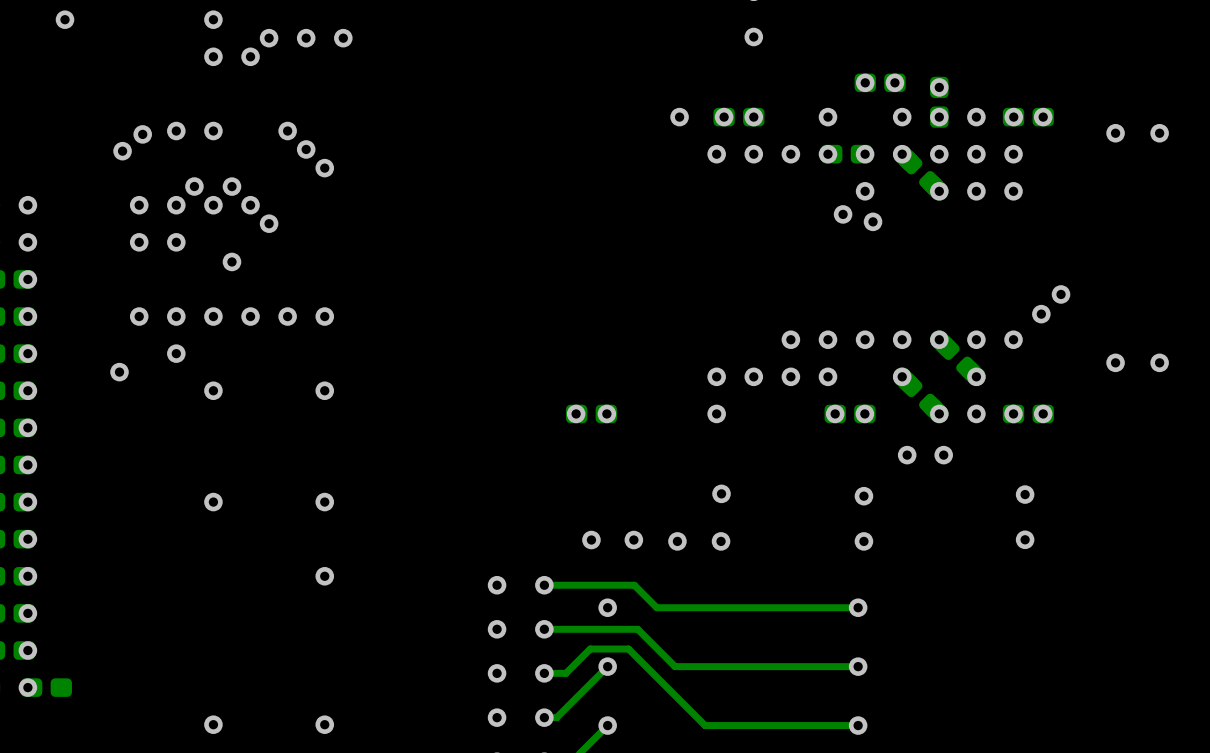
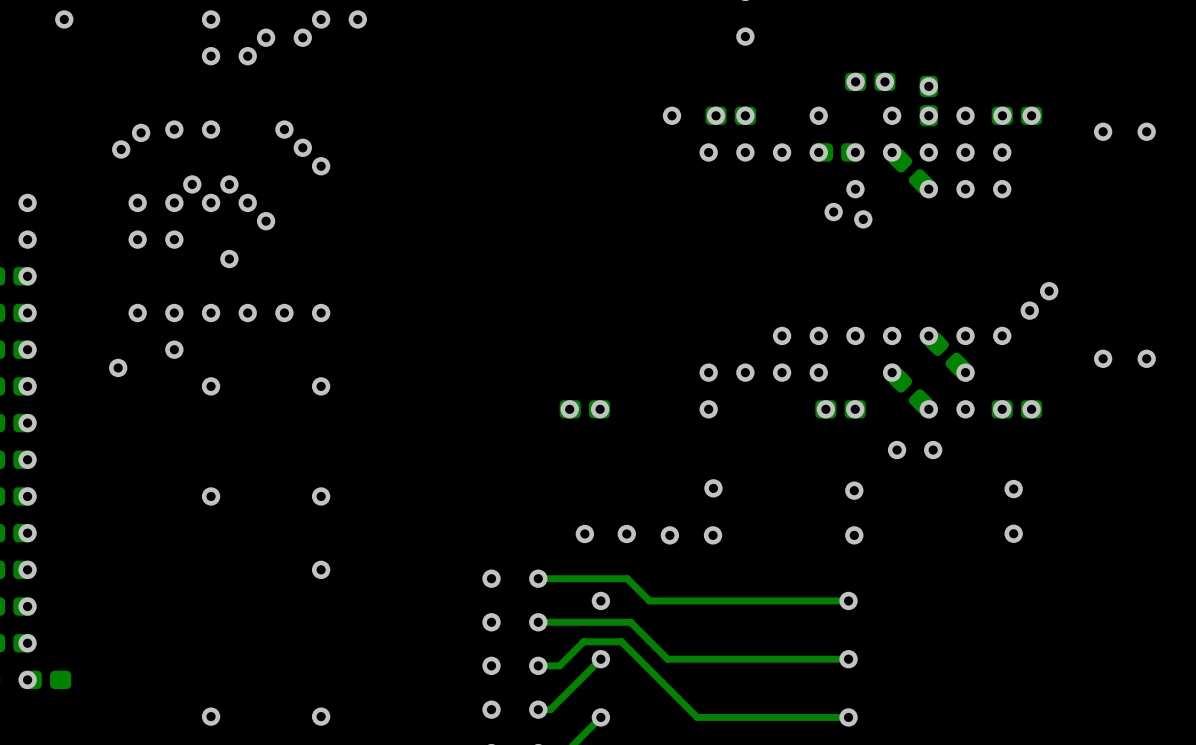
via: none -> (321, 19)
via: none -> (357, 19)
via: (343, 38) -> none

